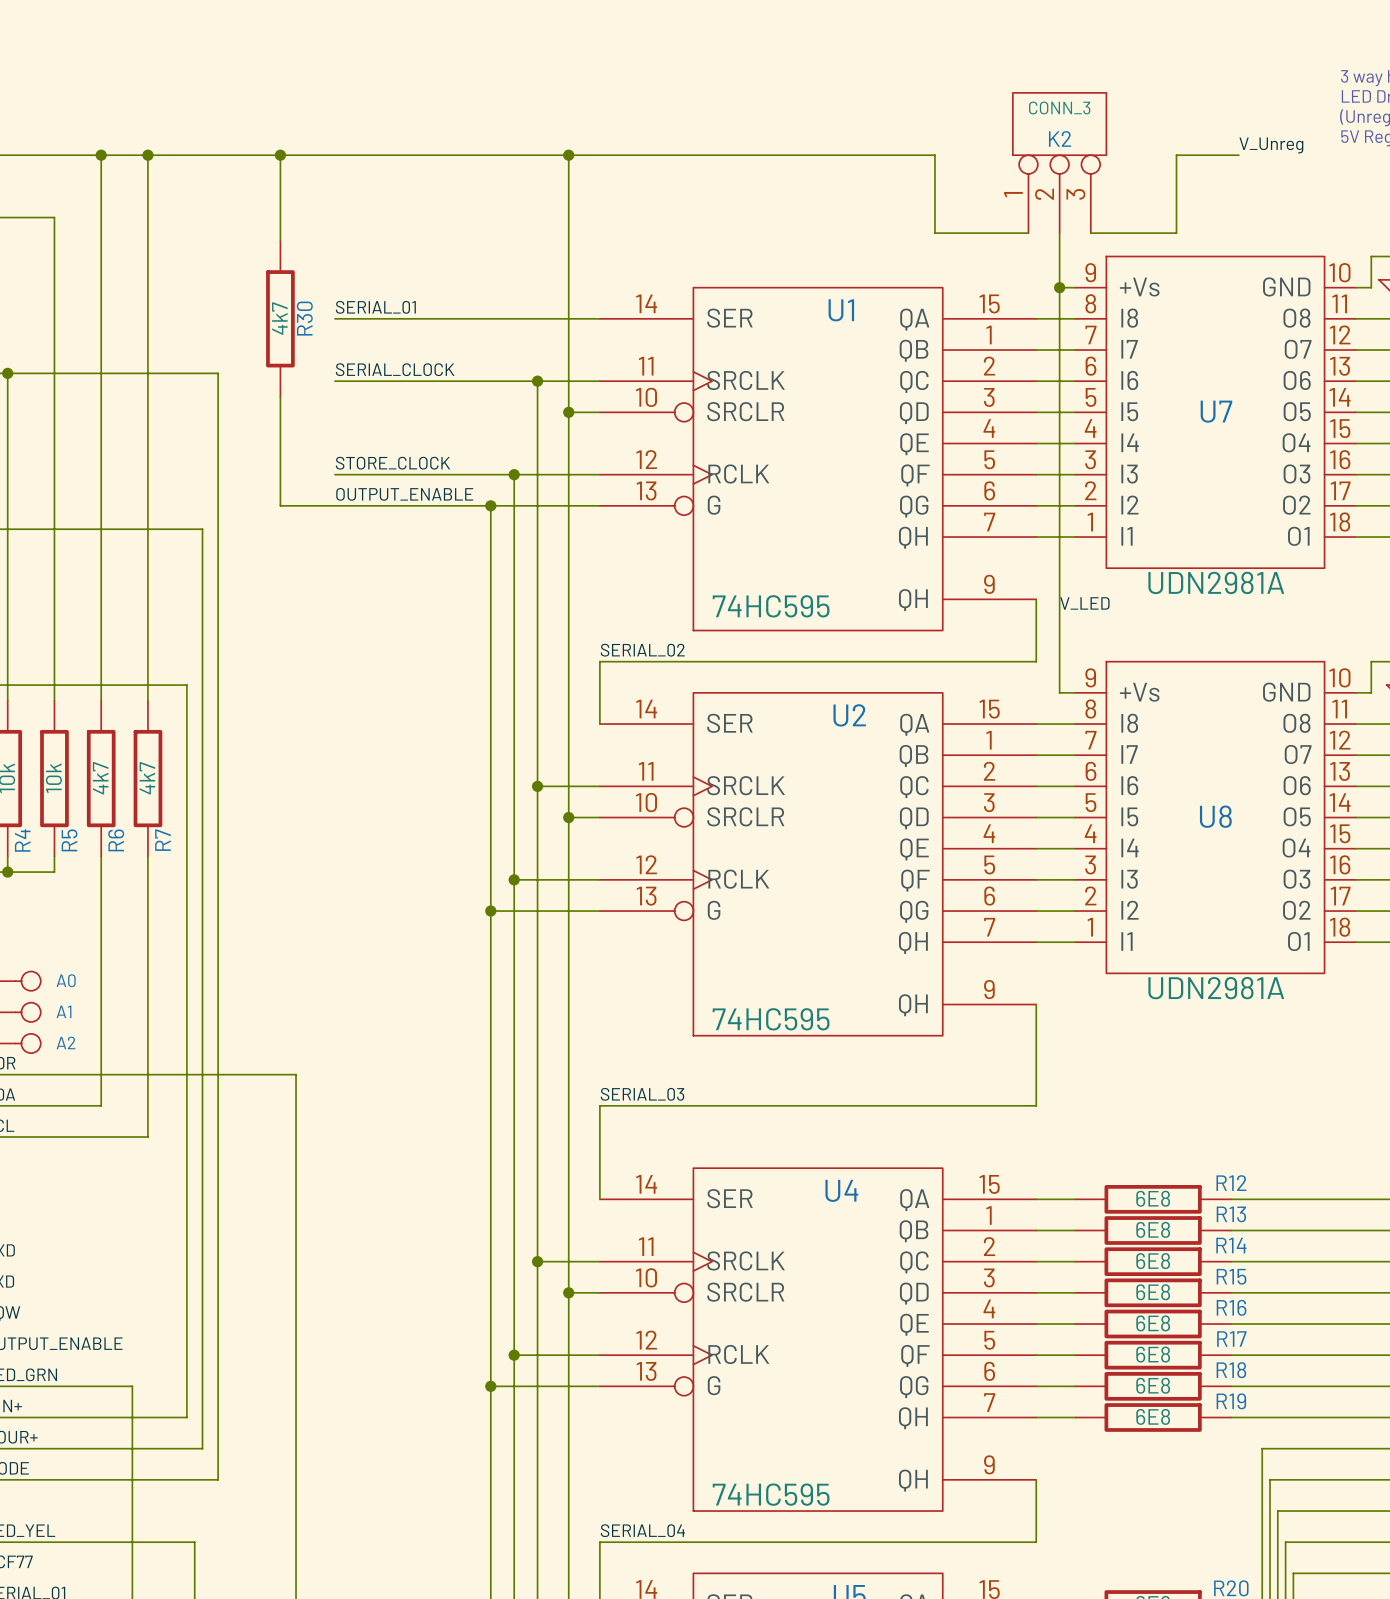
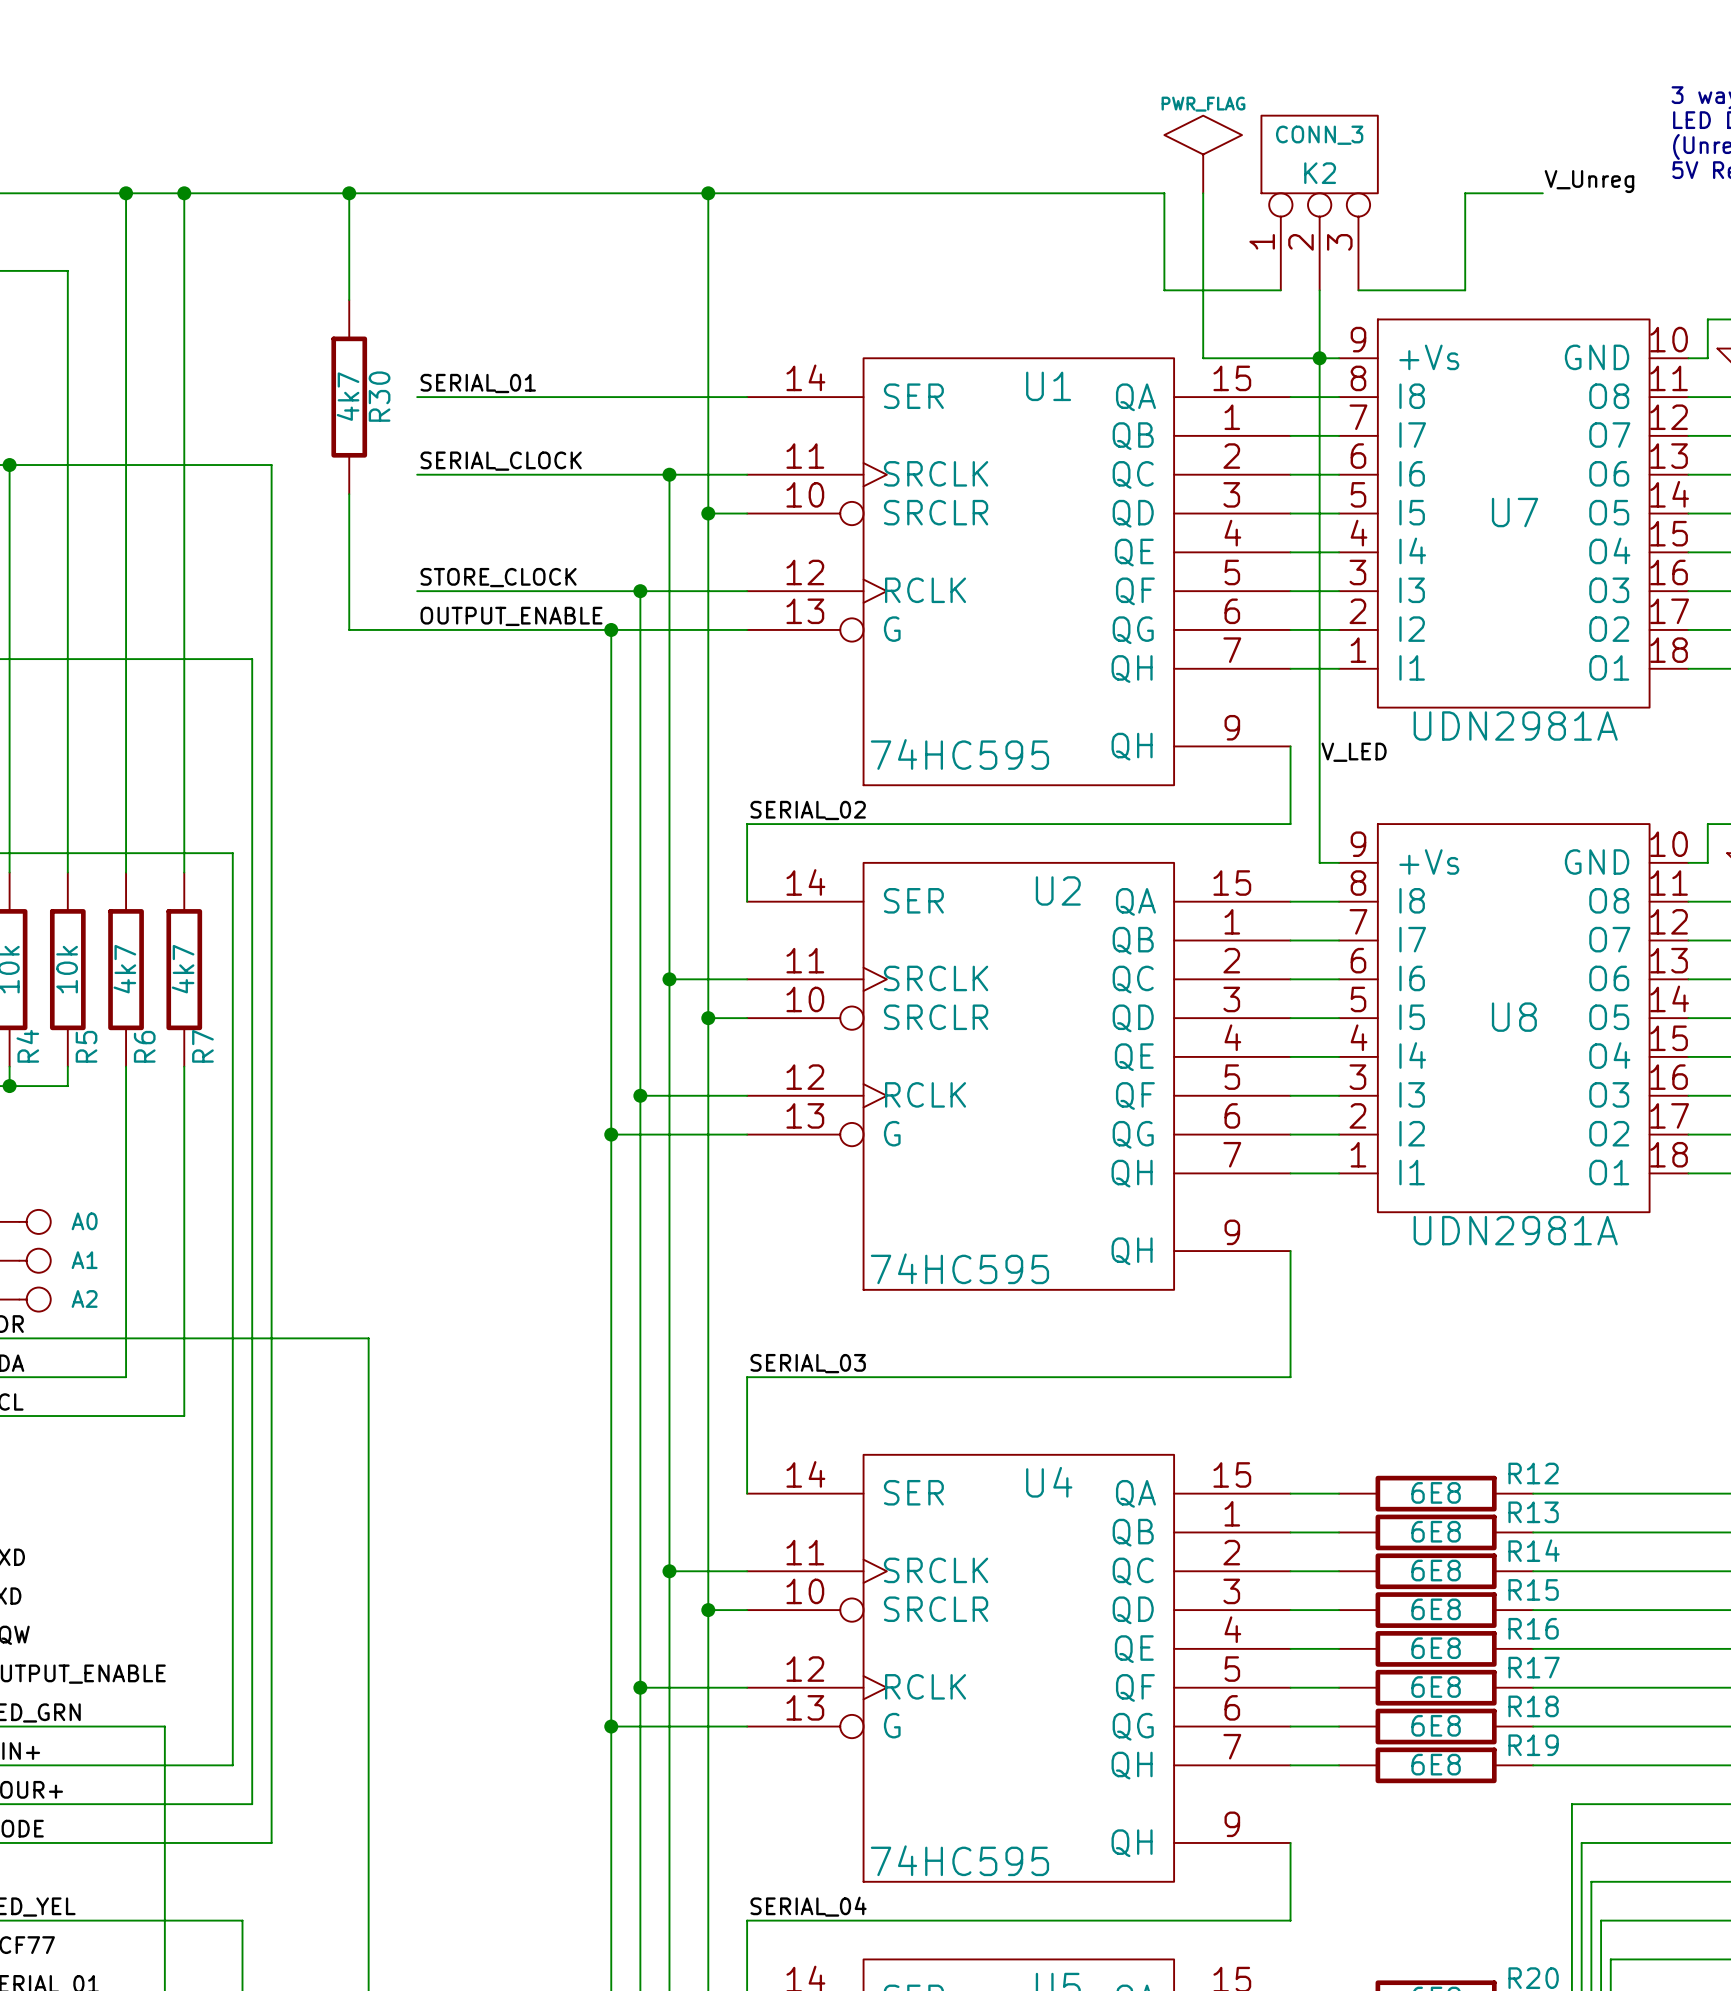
power symbol: none -> PWR_FLAG (1203, 154)
wire: none -> (1203, 193) (1203, 358) (1319, 358)

